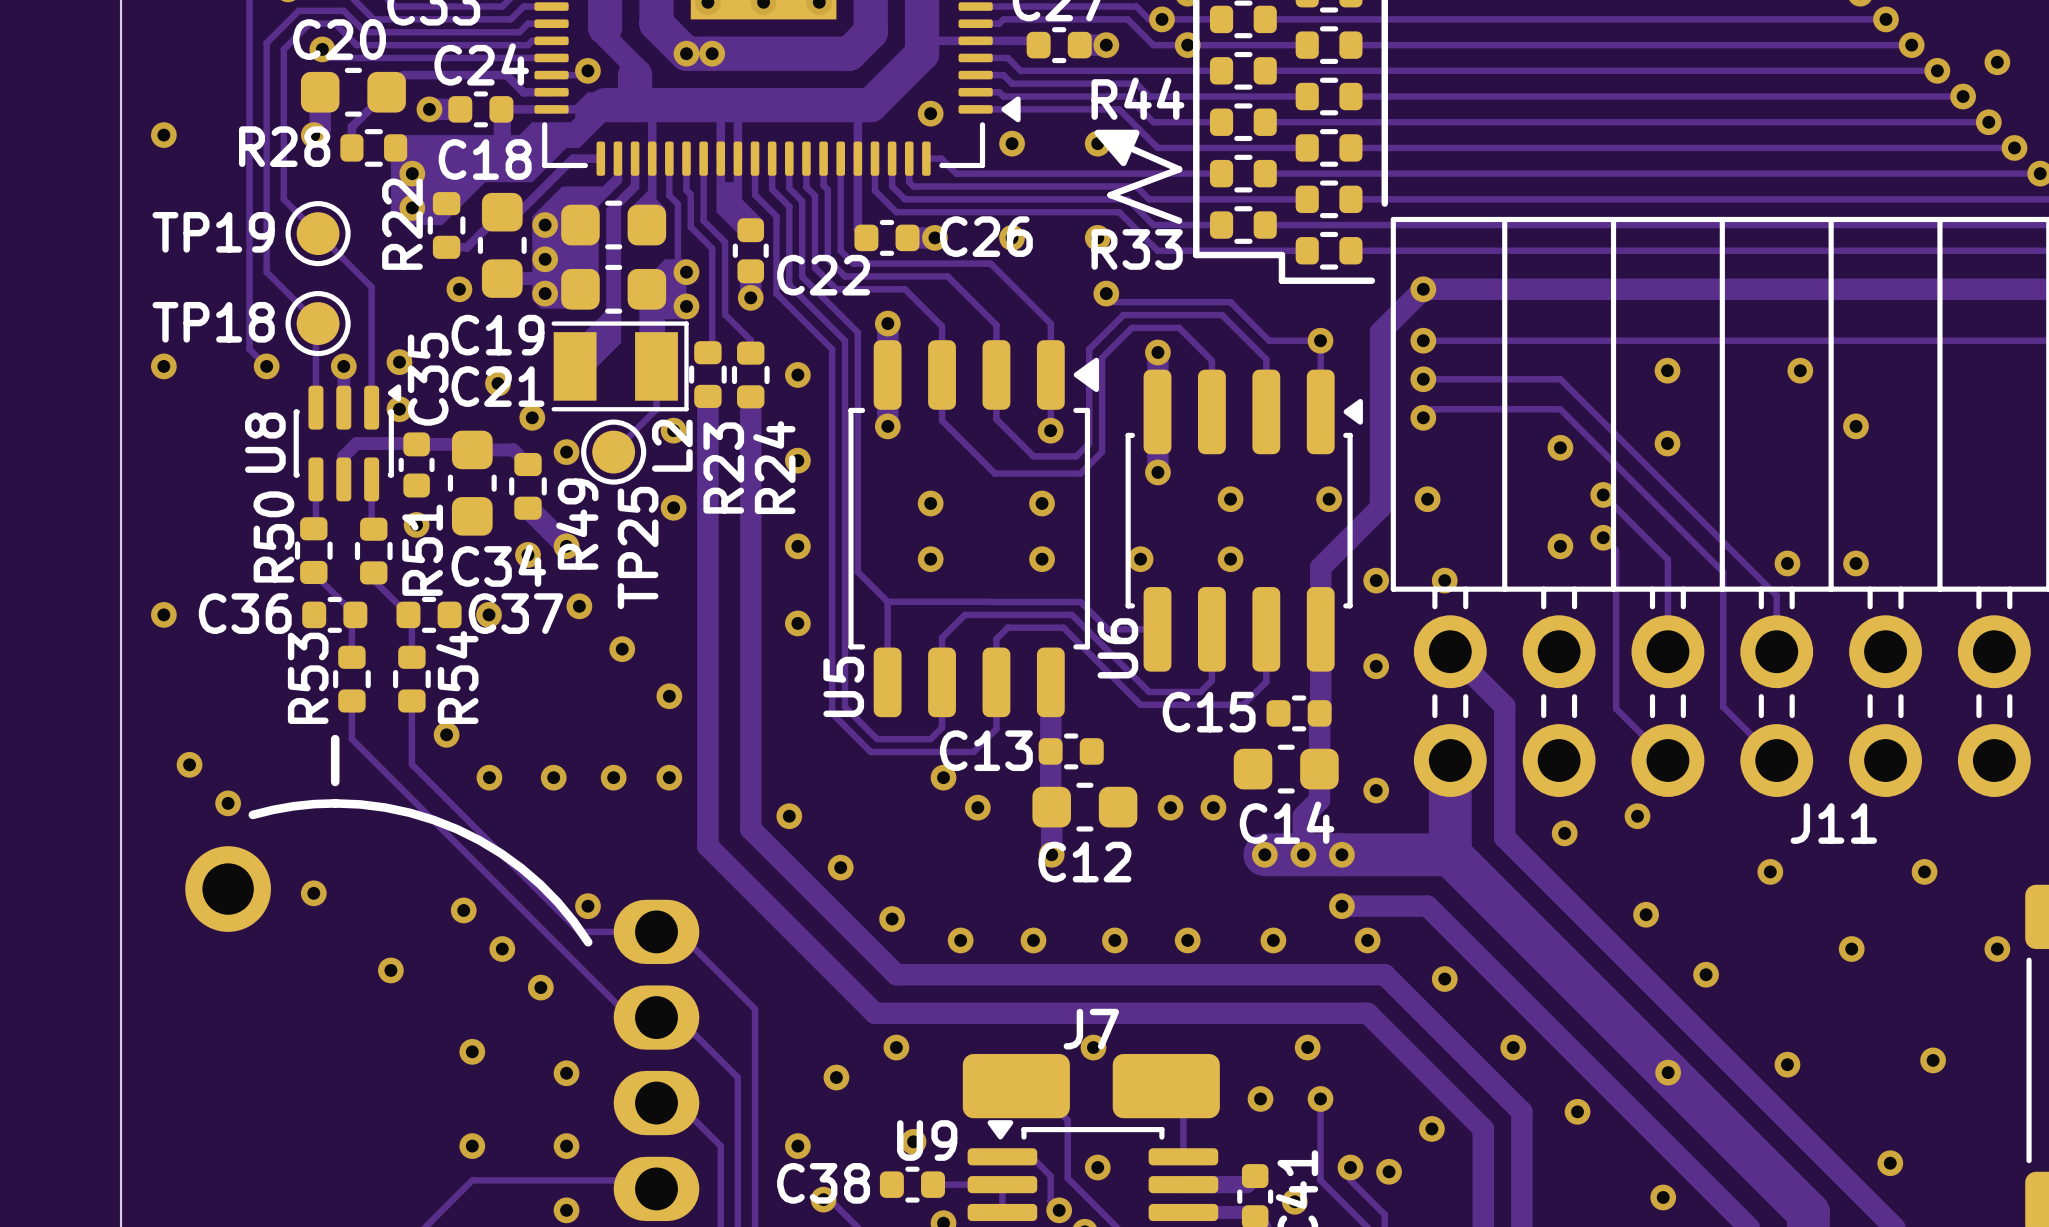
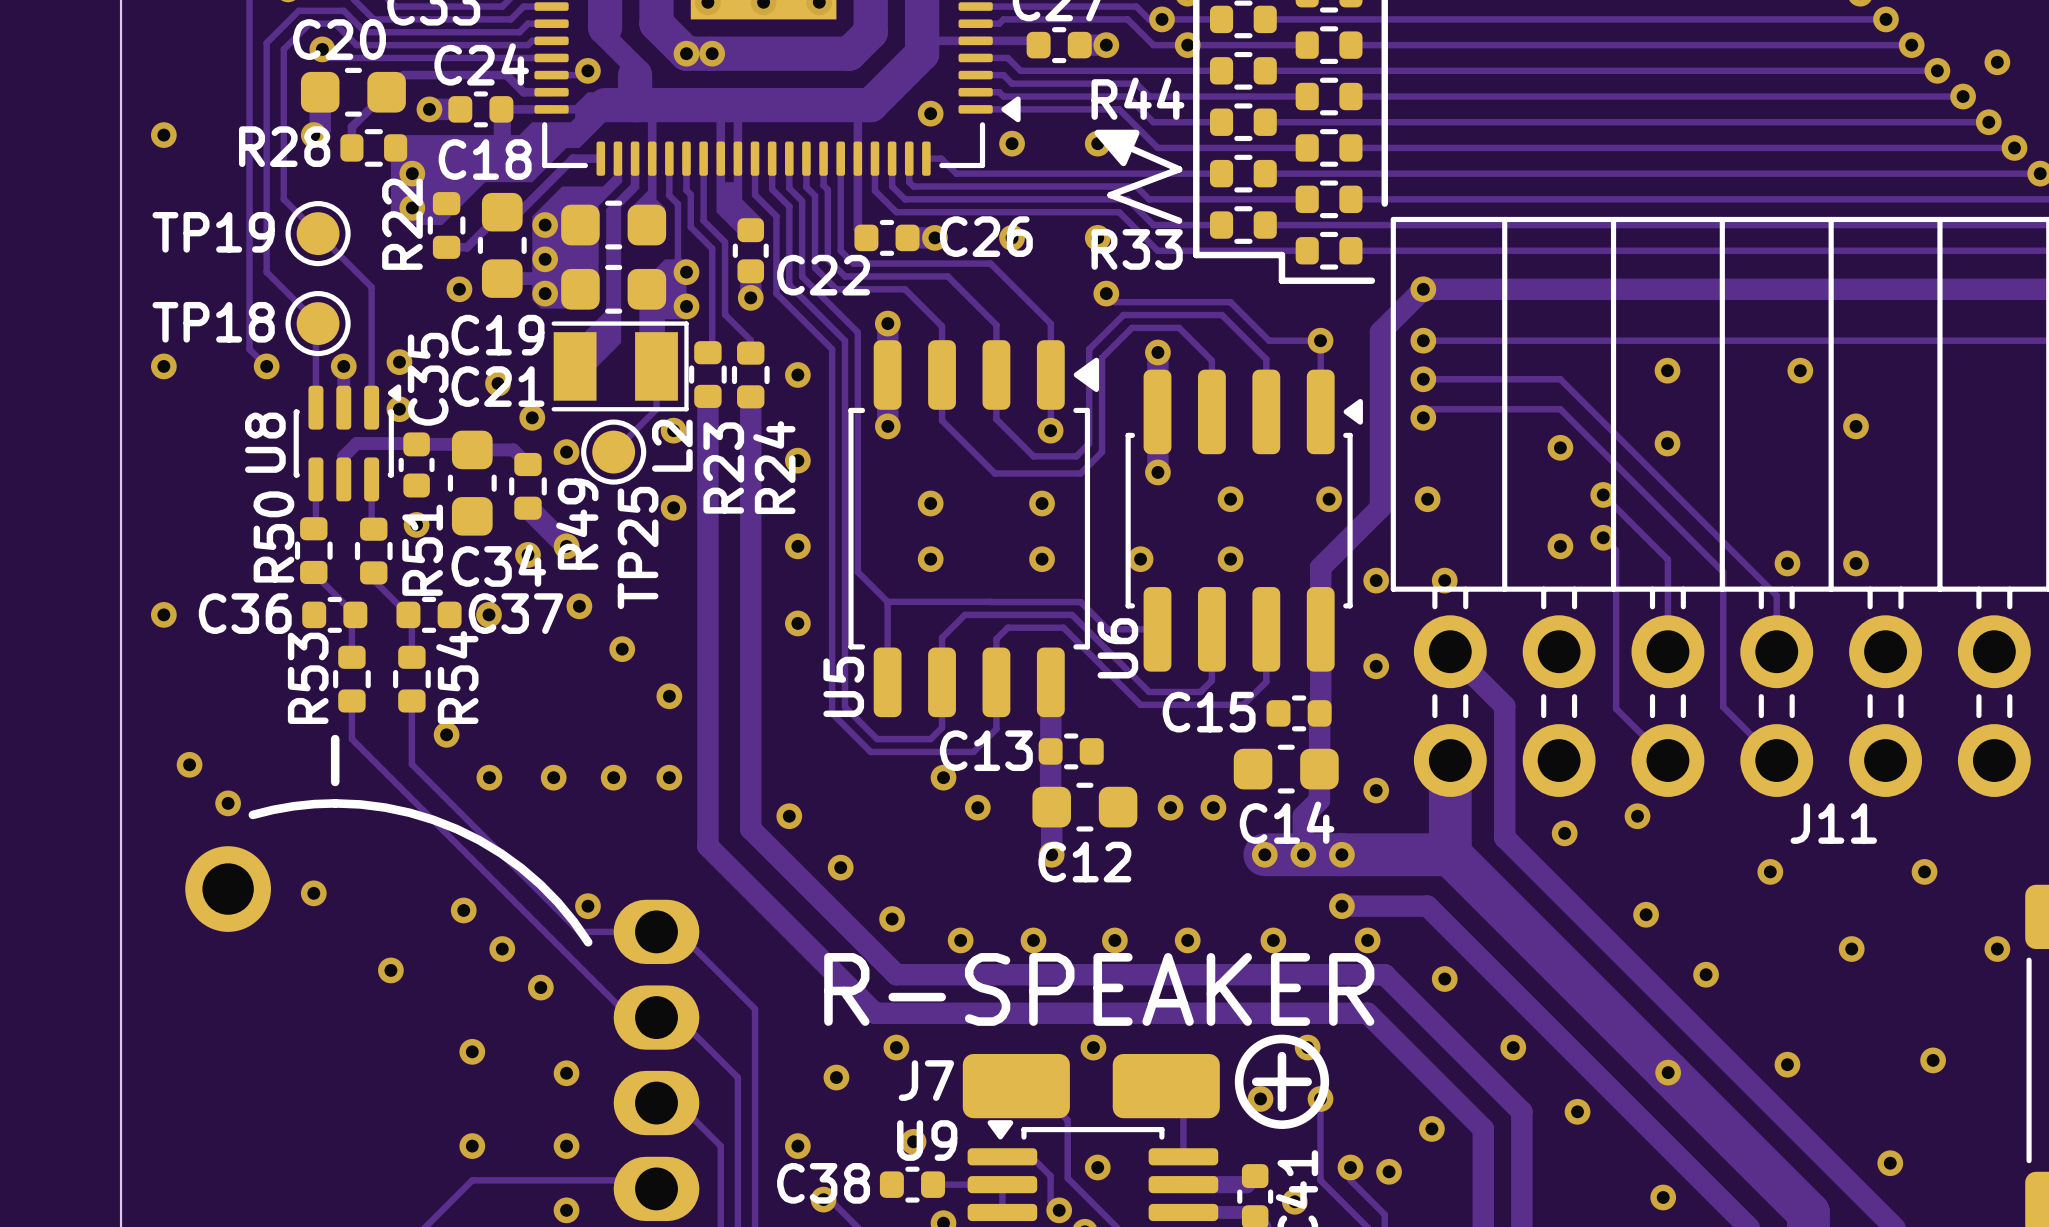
text: none -> R-SPEAKER (1099, 989)
J7 name position: J7 (1091, 1029) -> J7 (926, 1080)
drawing: none -> [1234, 1034, 1330, 1129]
line: none -> (1281, 1056) (1281, 1107)
line: none -> (1256, 1081) (1307, 1081)

